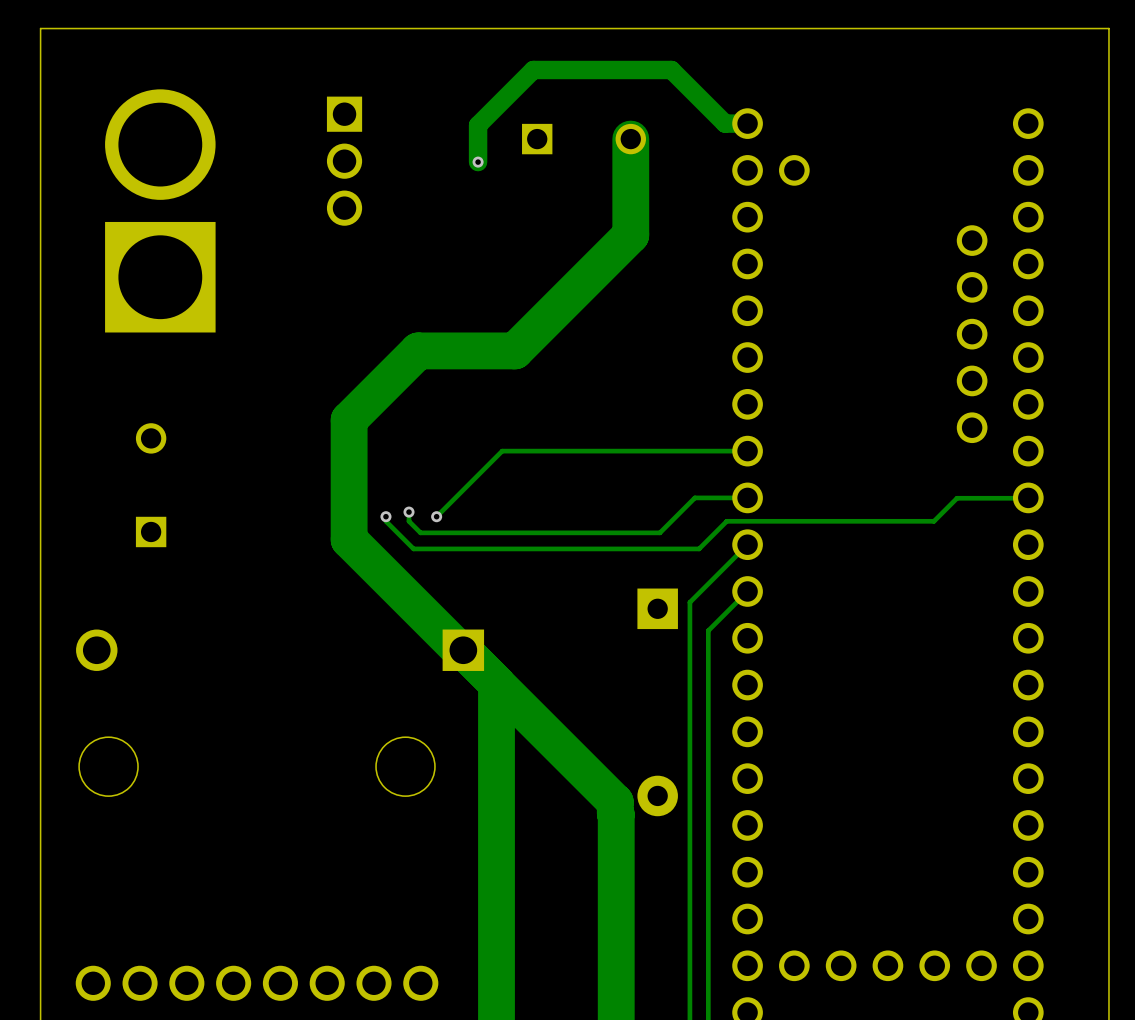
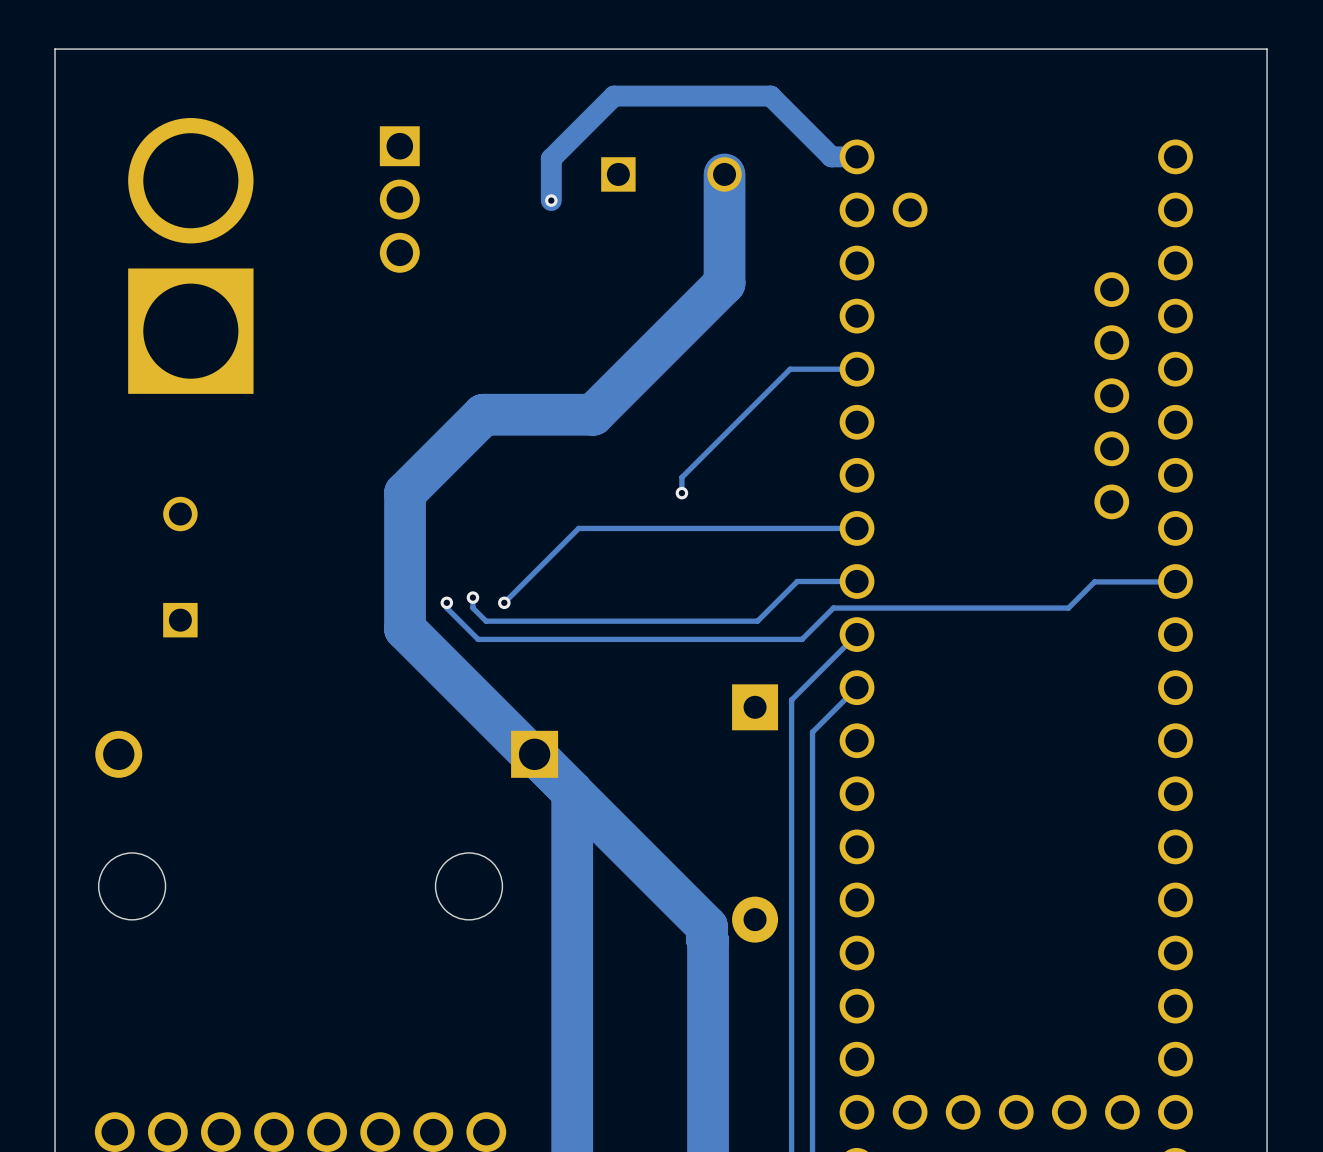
track: none -> (857, 369) (790, 369) (681, 477) (681, 493)
via: none -> (681, 493)

